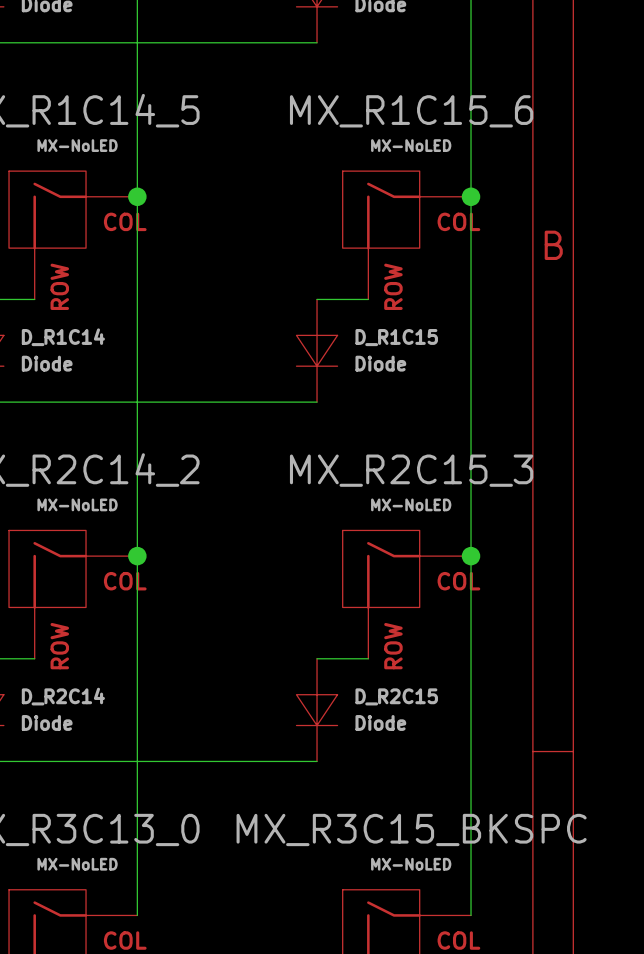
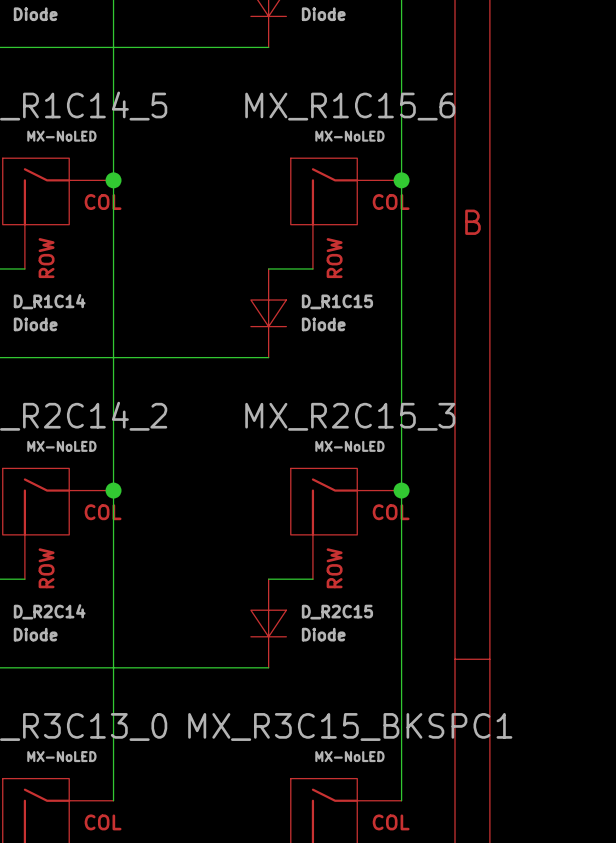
MX_R3C15_BKSPC name: MX_R3C15_BKSPC (411, 829) -> MX_R3C15_BKSPC1 (350, 726)

